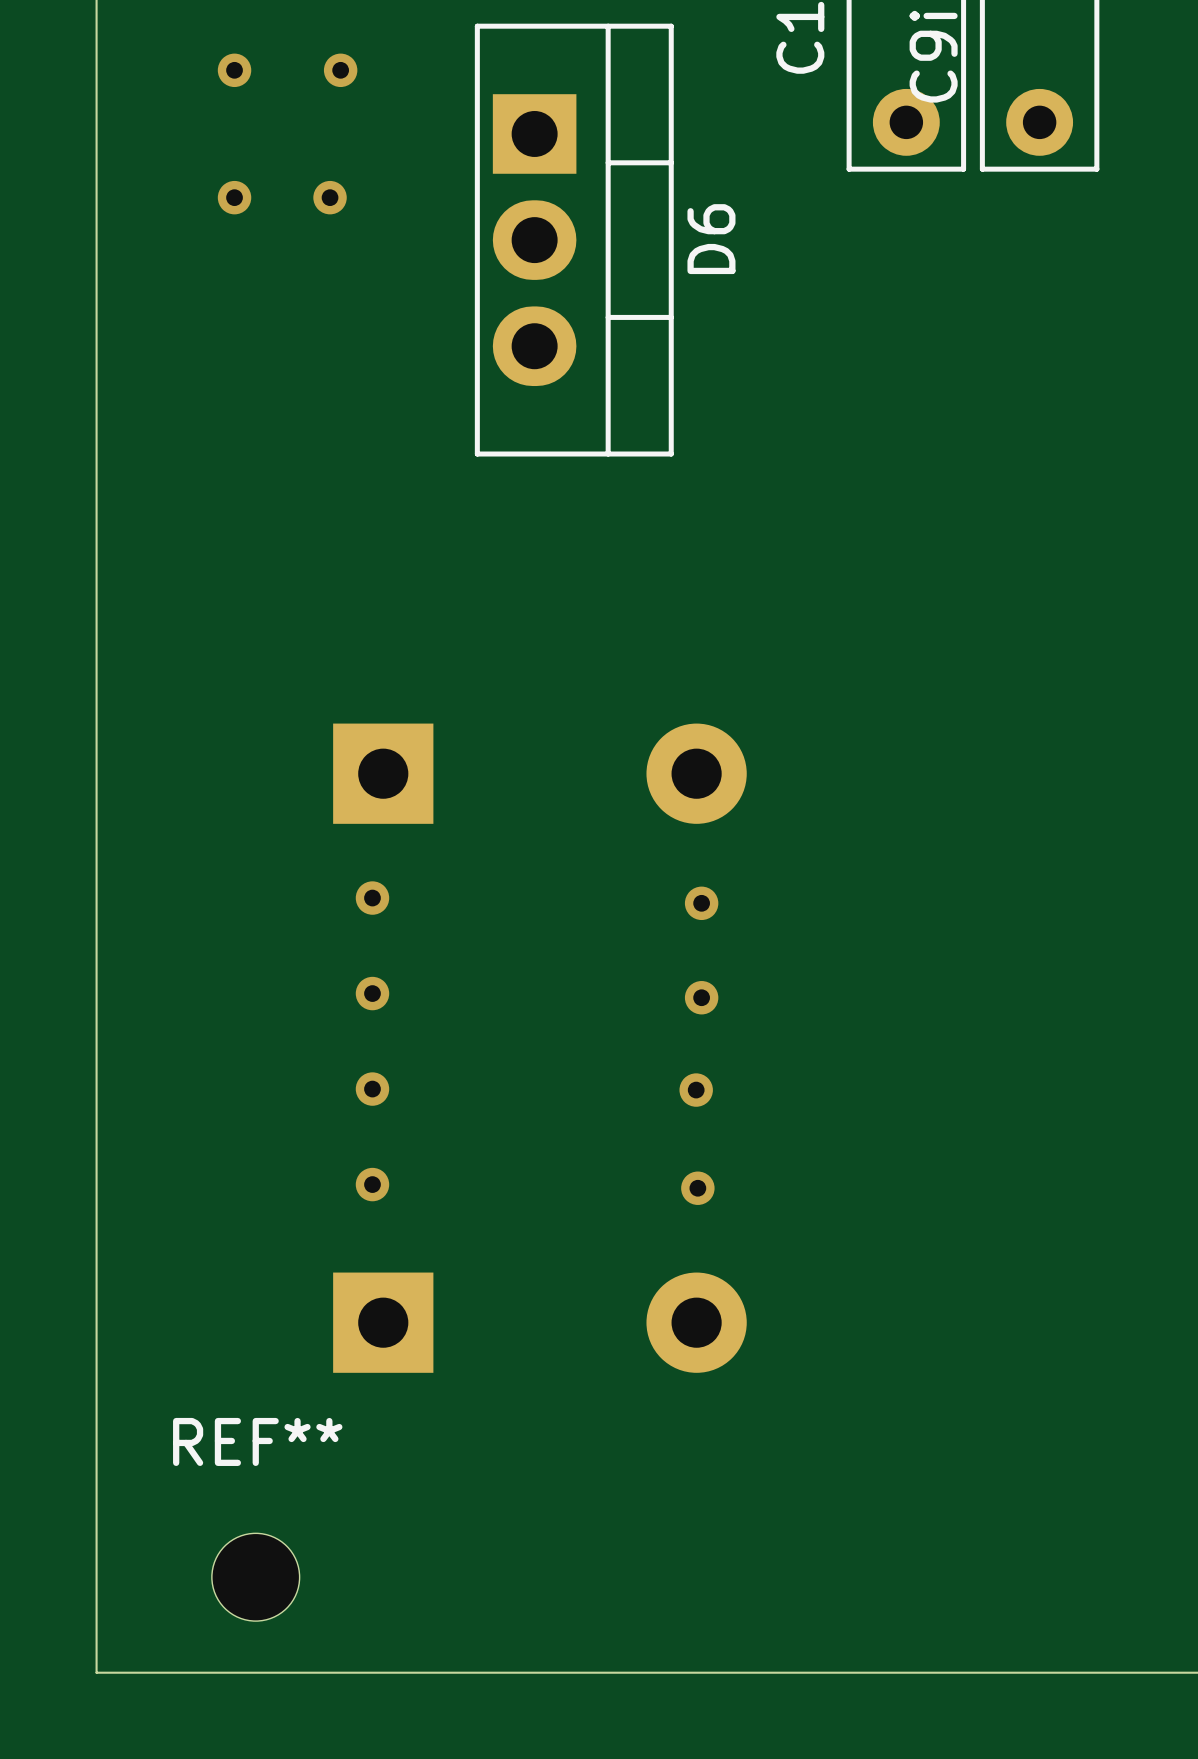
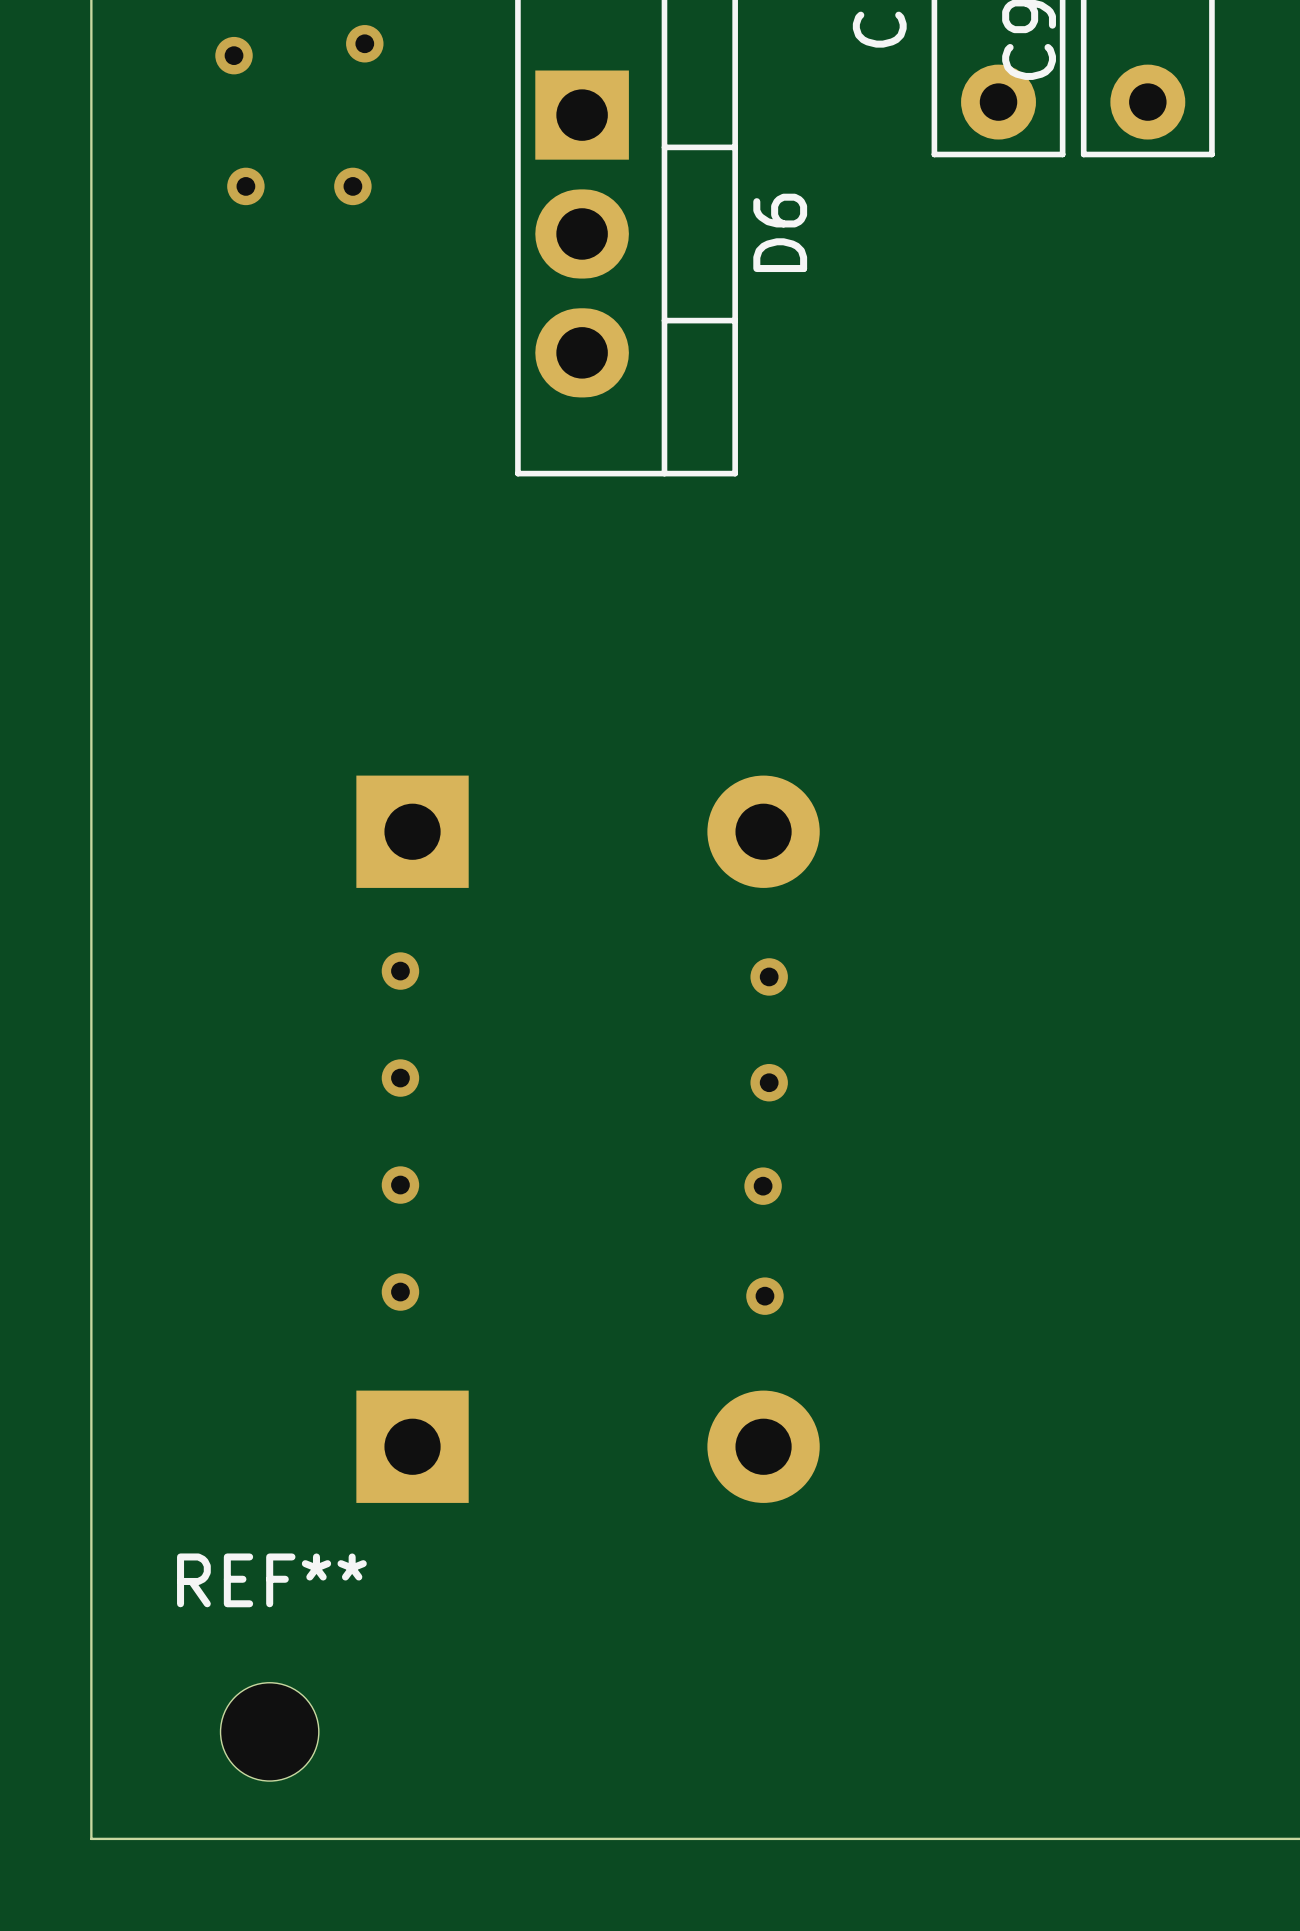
via position: (234, 70) -> (234, 55)

